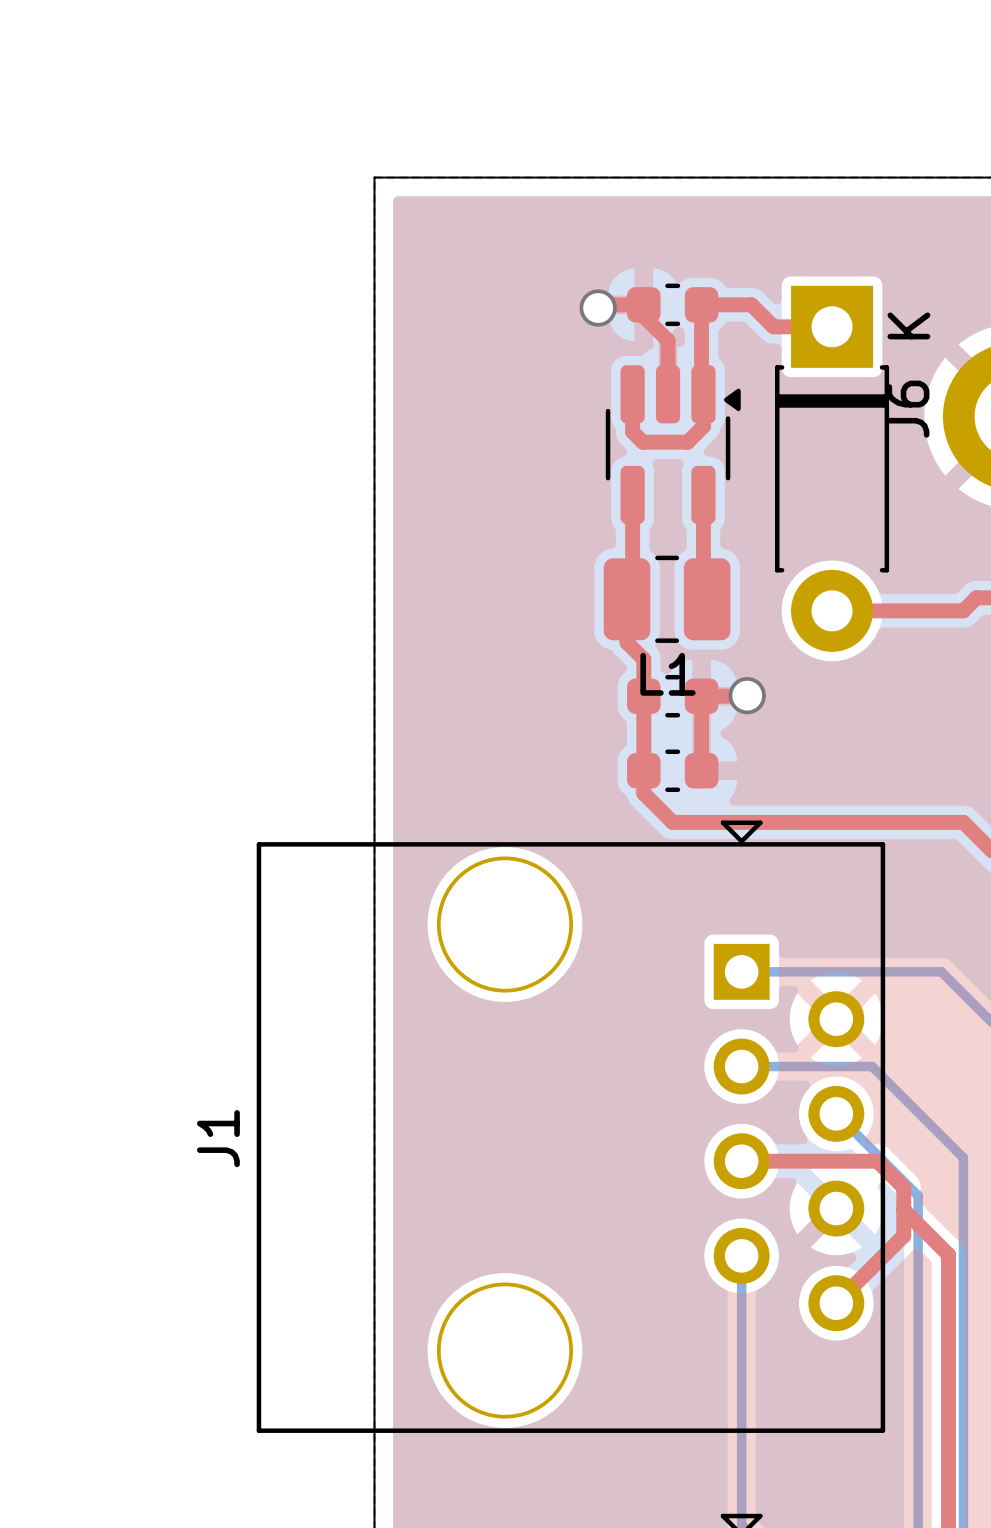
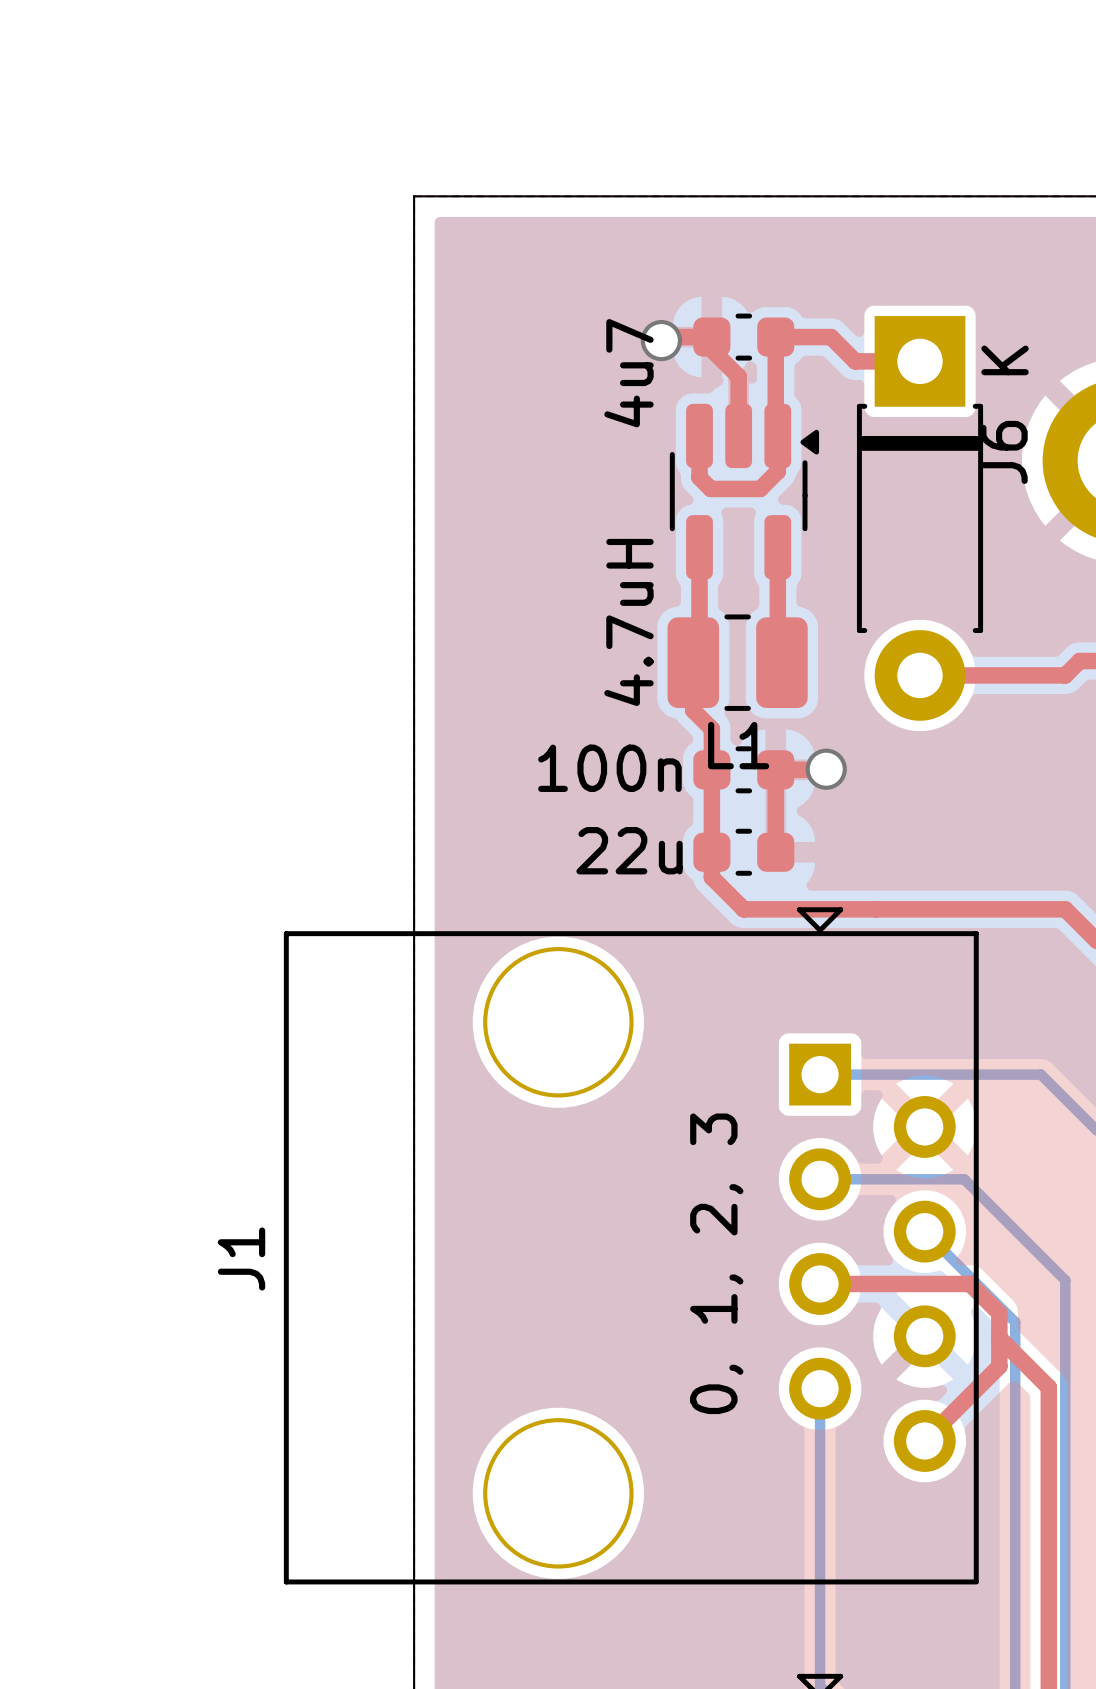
part value: none -> 4u7 (628, 373)
L1 value: none -> 4.7uH (628, 622)
part value: none -> 100n (609, 768)
part value: none -> 22u (629, 850)
J1 value: none -> 0, 1, 2, 3 (716, 1263)

